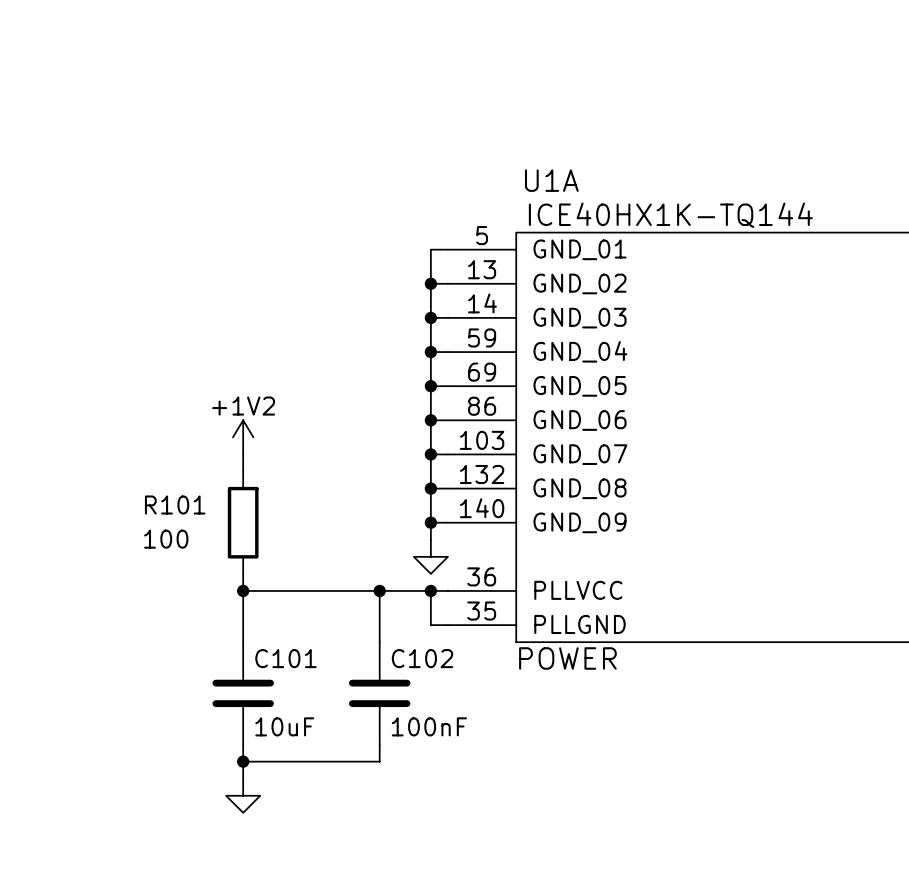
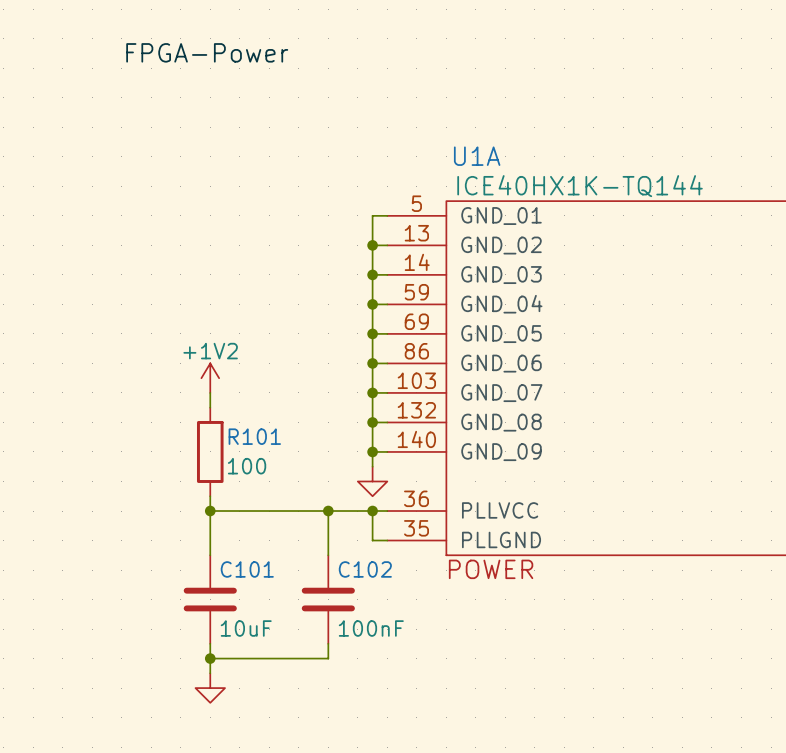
label: none -> FPGA-Power (207, 52)
R101 name position: R101 (175, 505) -> R101 (254, 436)
R101 value position: 100 (166, 539) -> 100 (247, 466)

